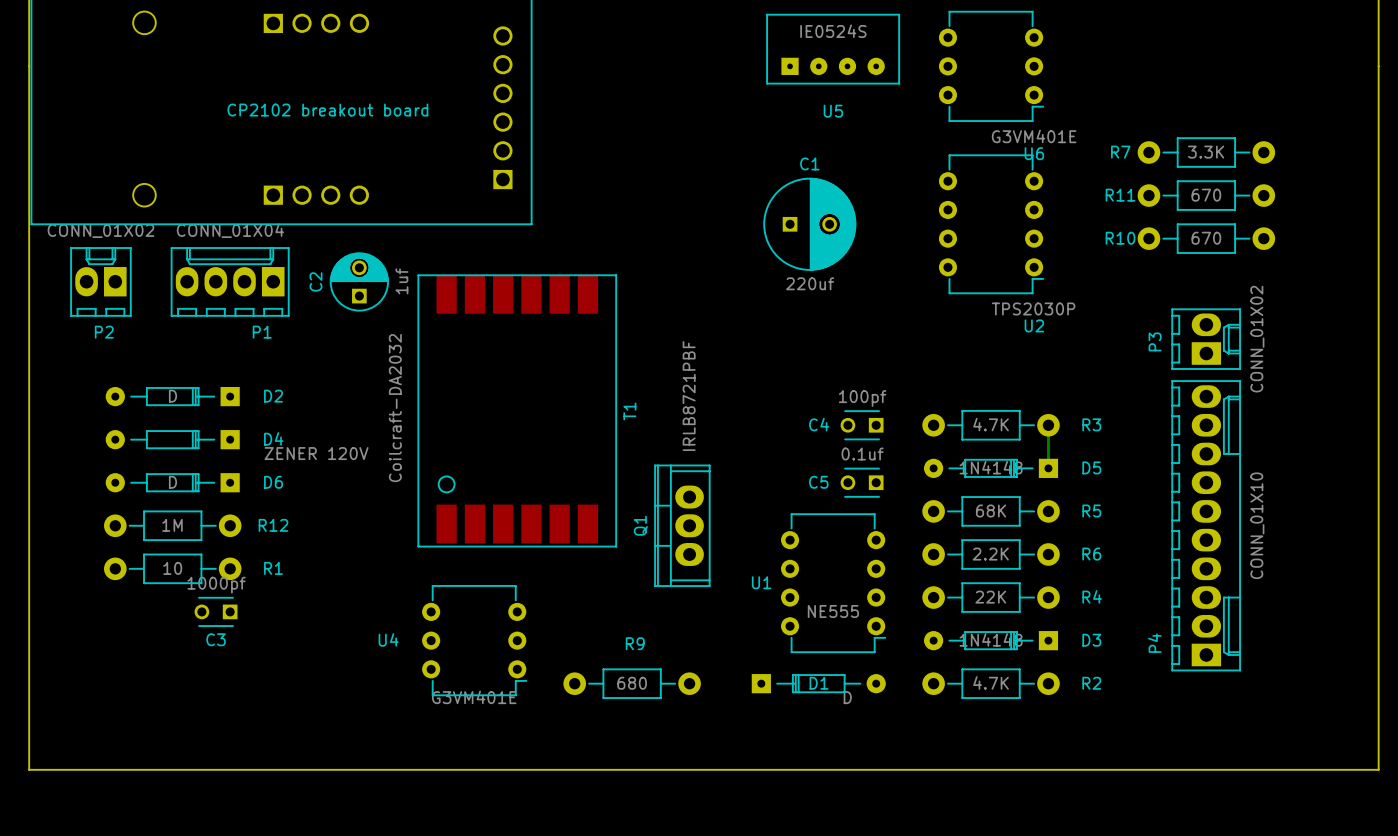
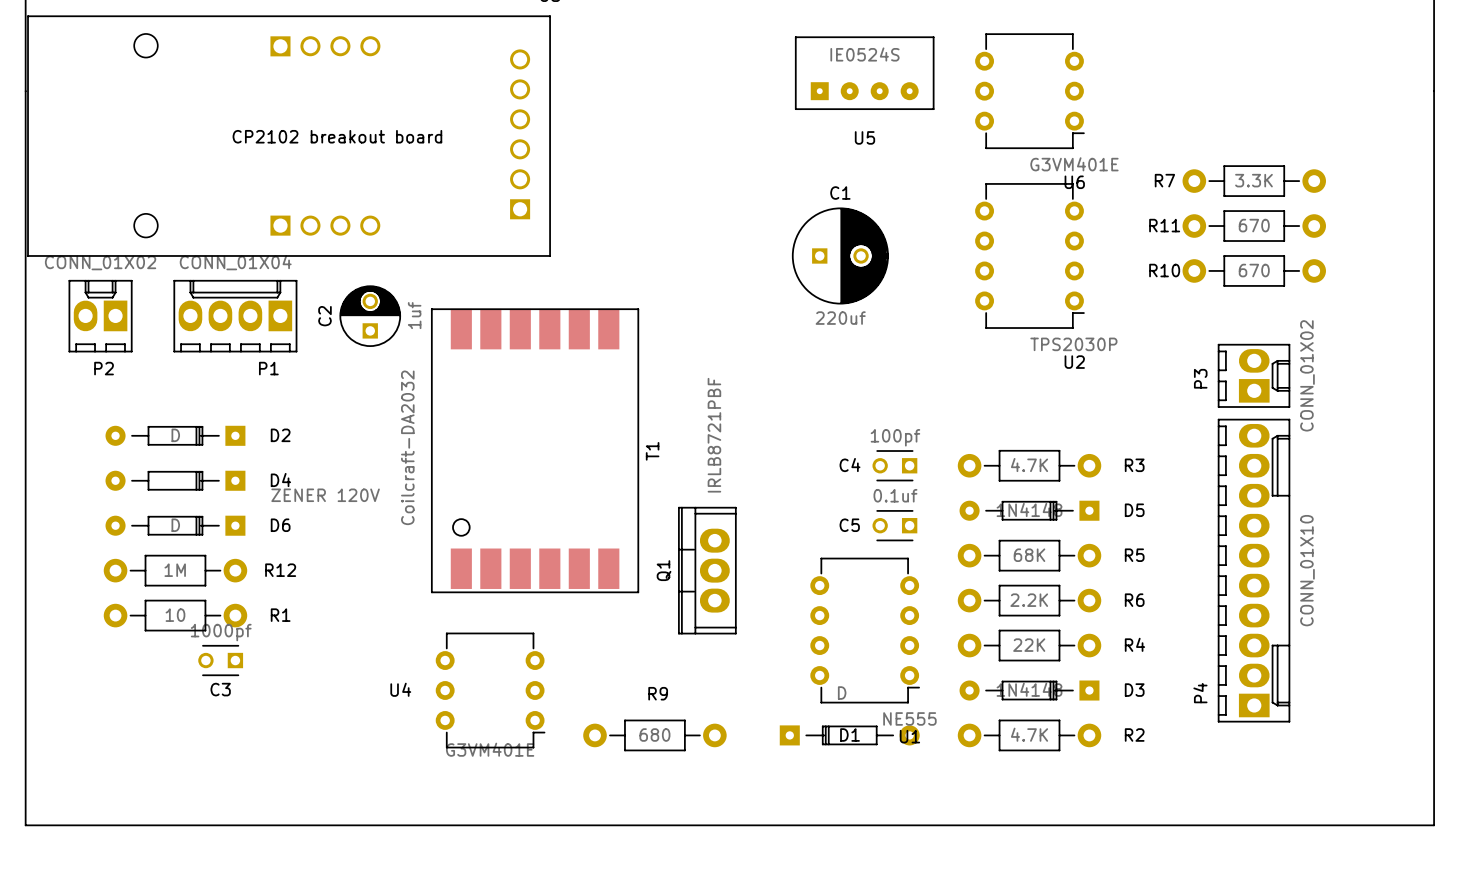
bottom track: (1048, 425) (1048, 468) -> none
U1 name position: U1 (761, 582) -> U1 (909, 736)
U1 value position: NE555 (833, 611) -> NE555 (909, 718)
D1 value position: D (847, 697) -> D (842, 693)

